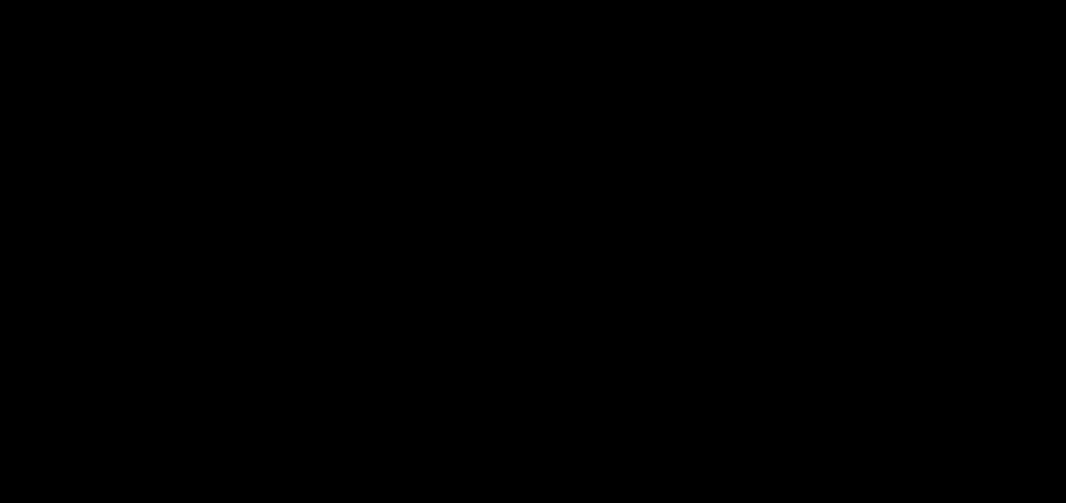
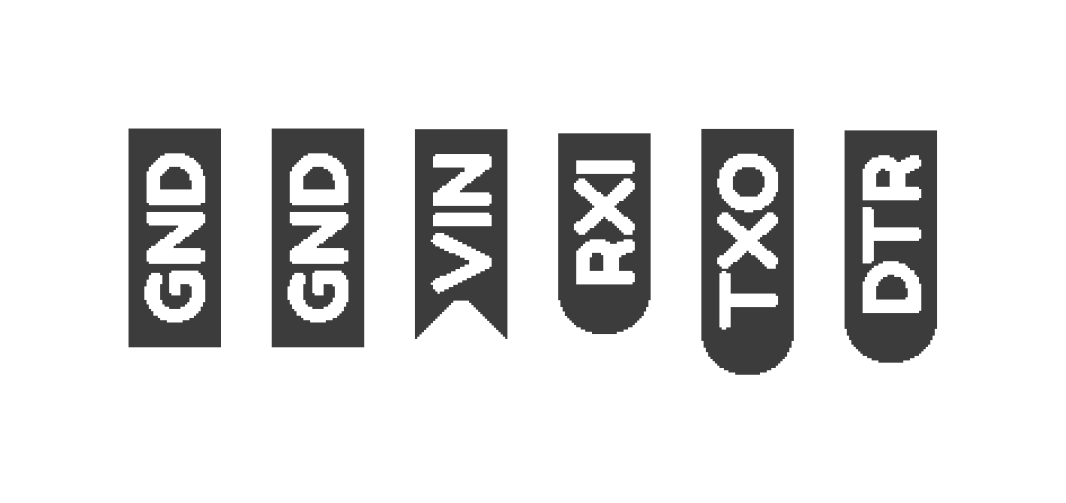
drawing: none -> [128, 128, 938, 375]

